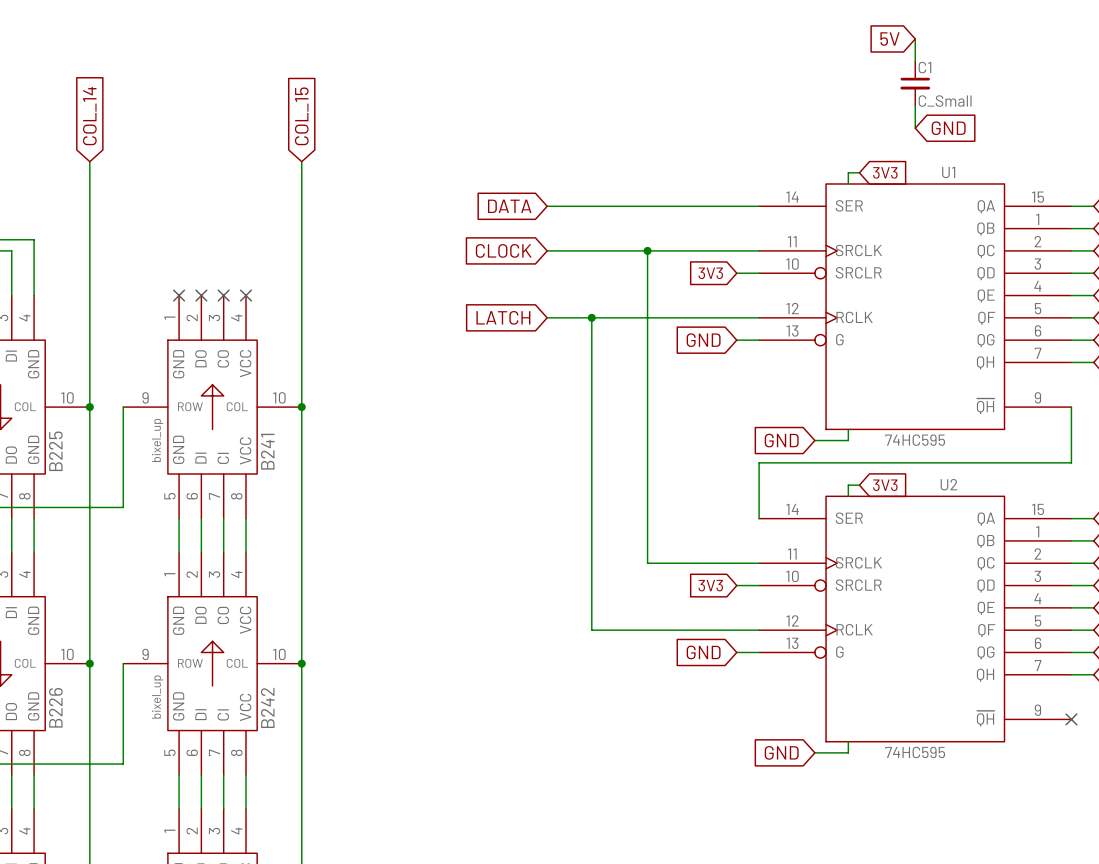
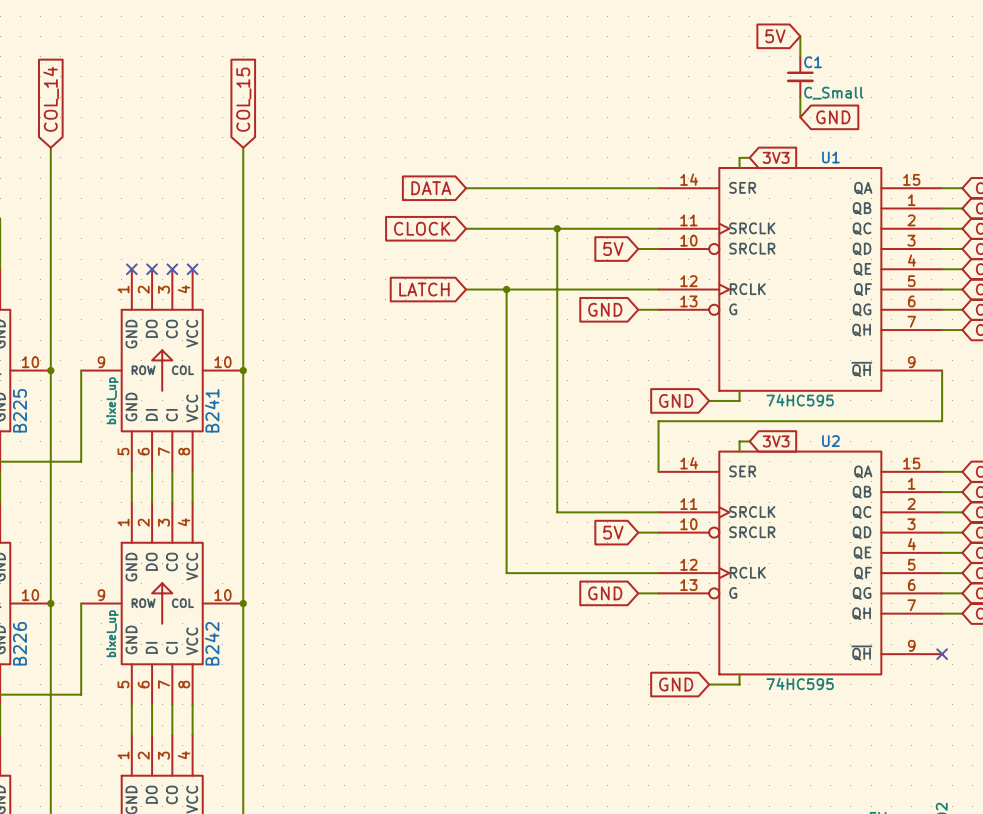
global label: 3V3 (710, 273) -> 5V (613, 249)
global label: 3V3 (710, 585) -> 5V (613, 532)

